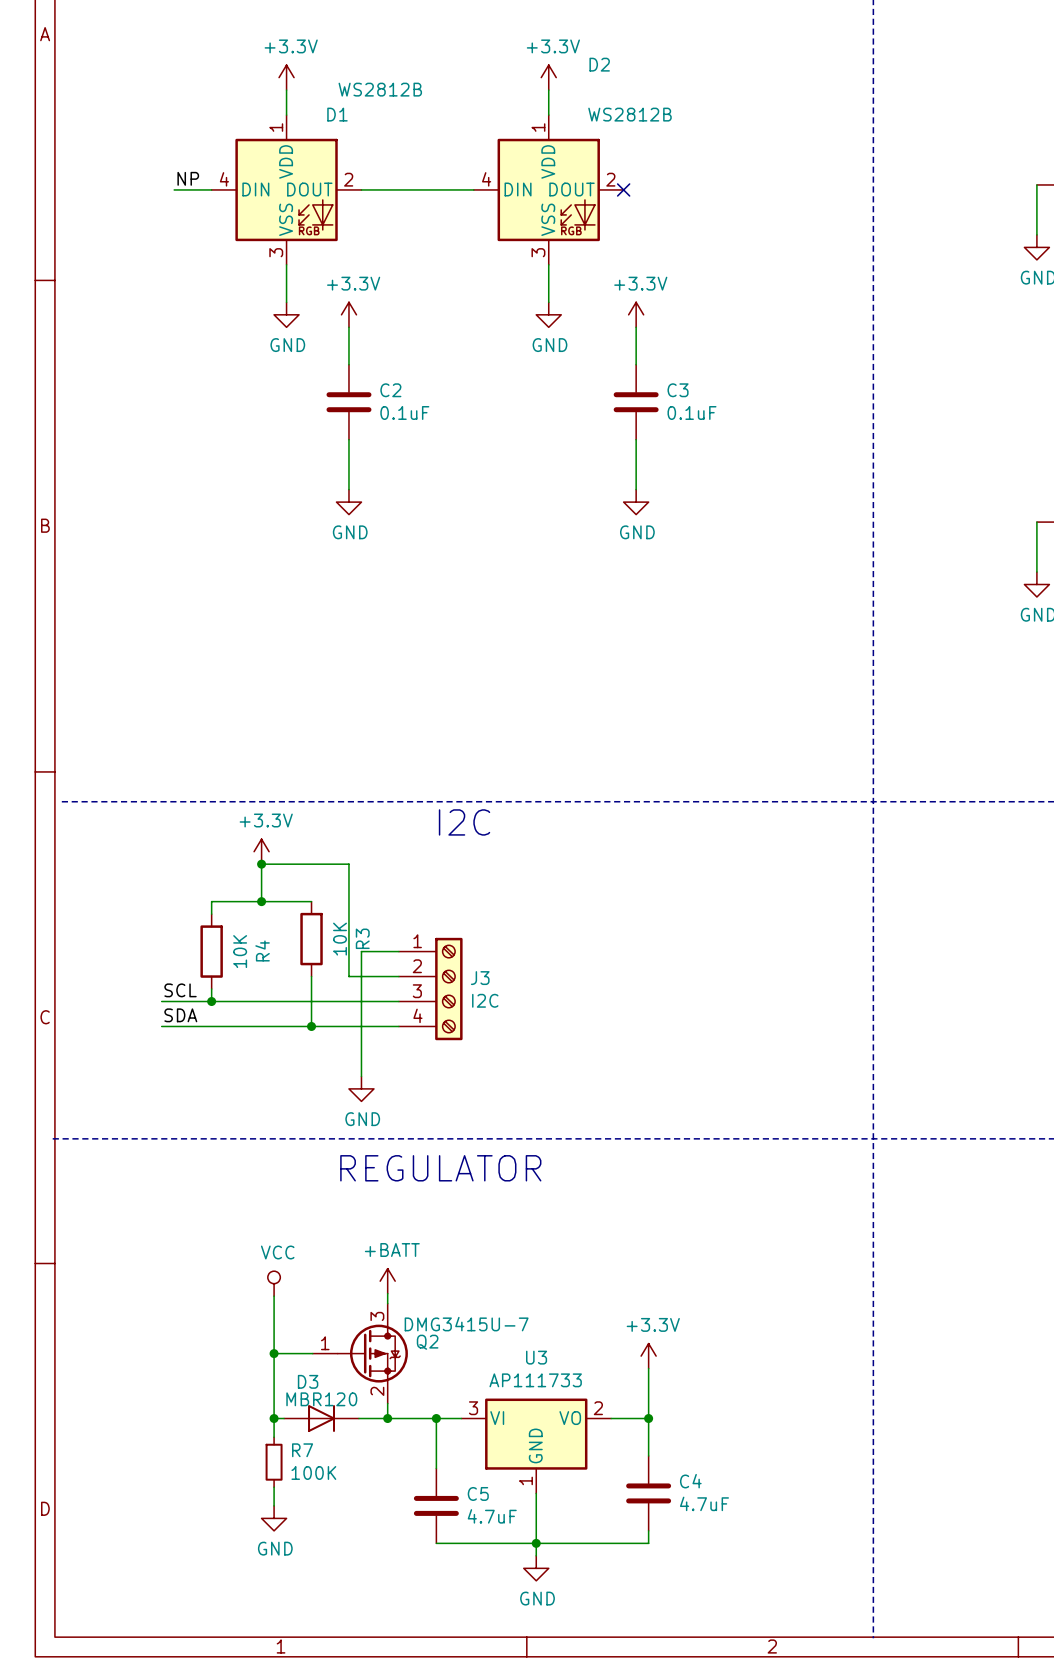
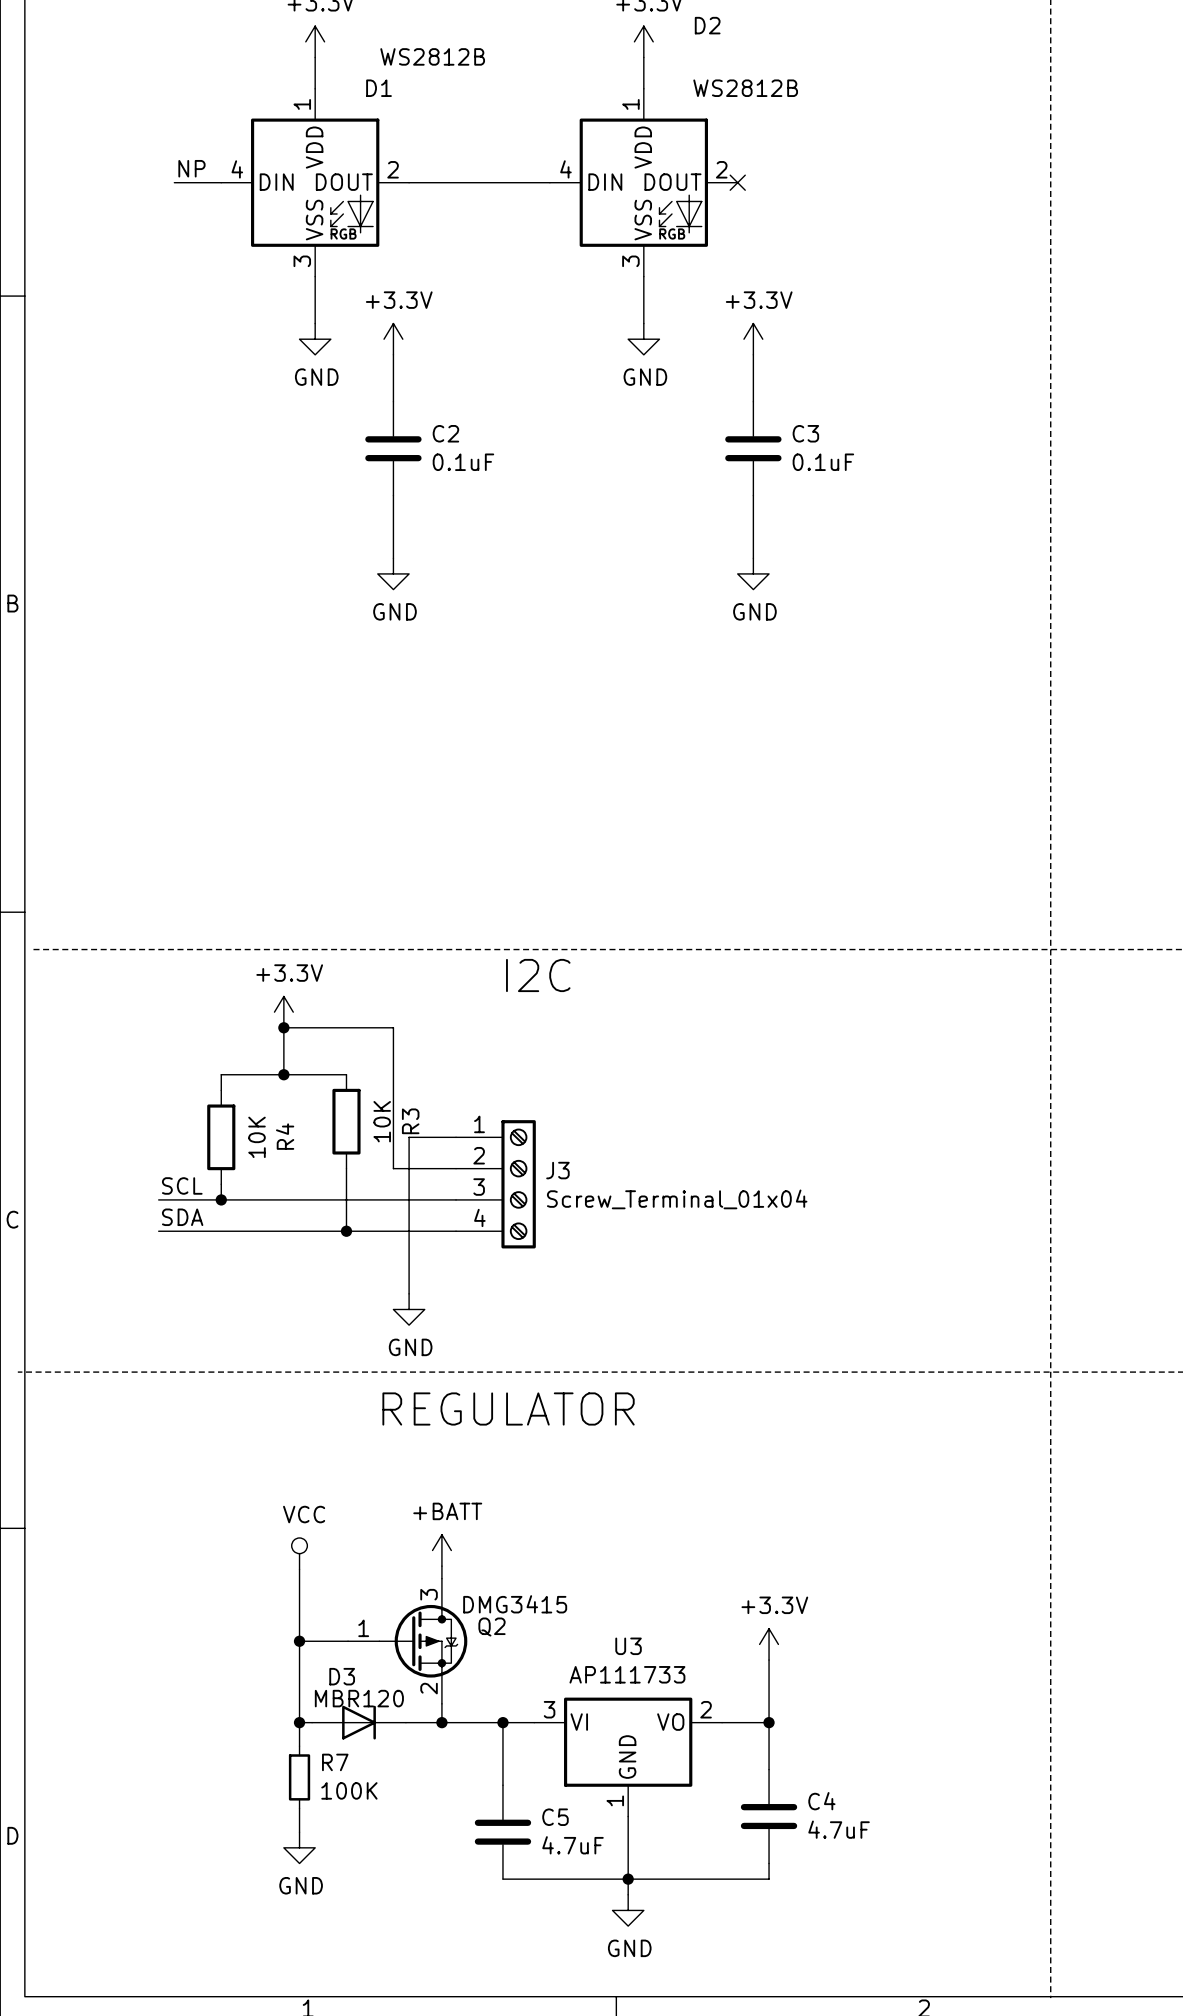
J3 value: I2C (485, 1000) -> Screw_Terminal_01x04 (677, 1199)
Q2 value: DMG3415U-7 (466, 1324) -> DMG3415 (515, 1604)

